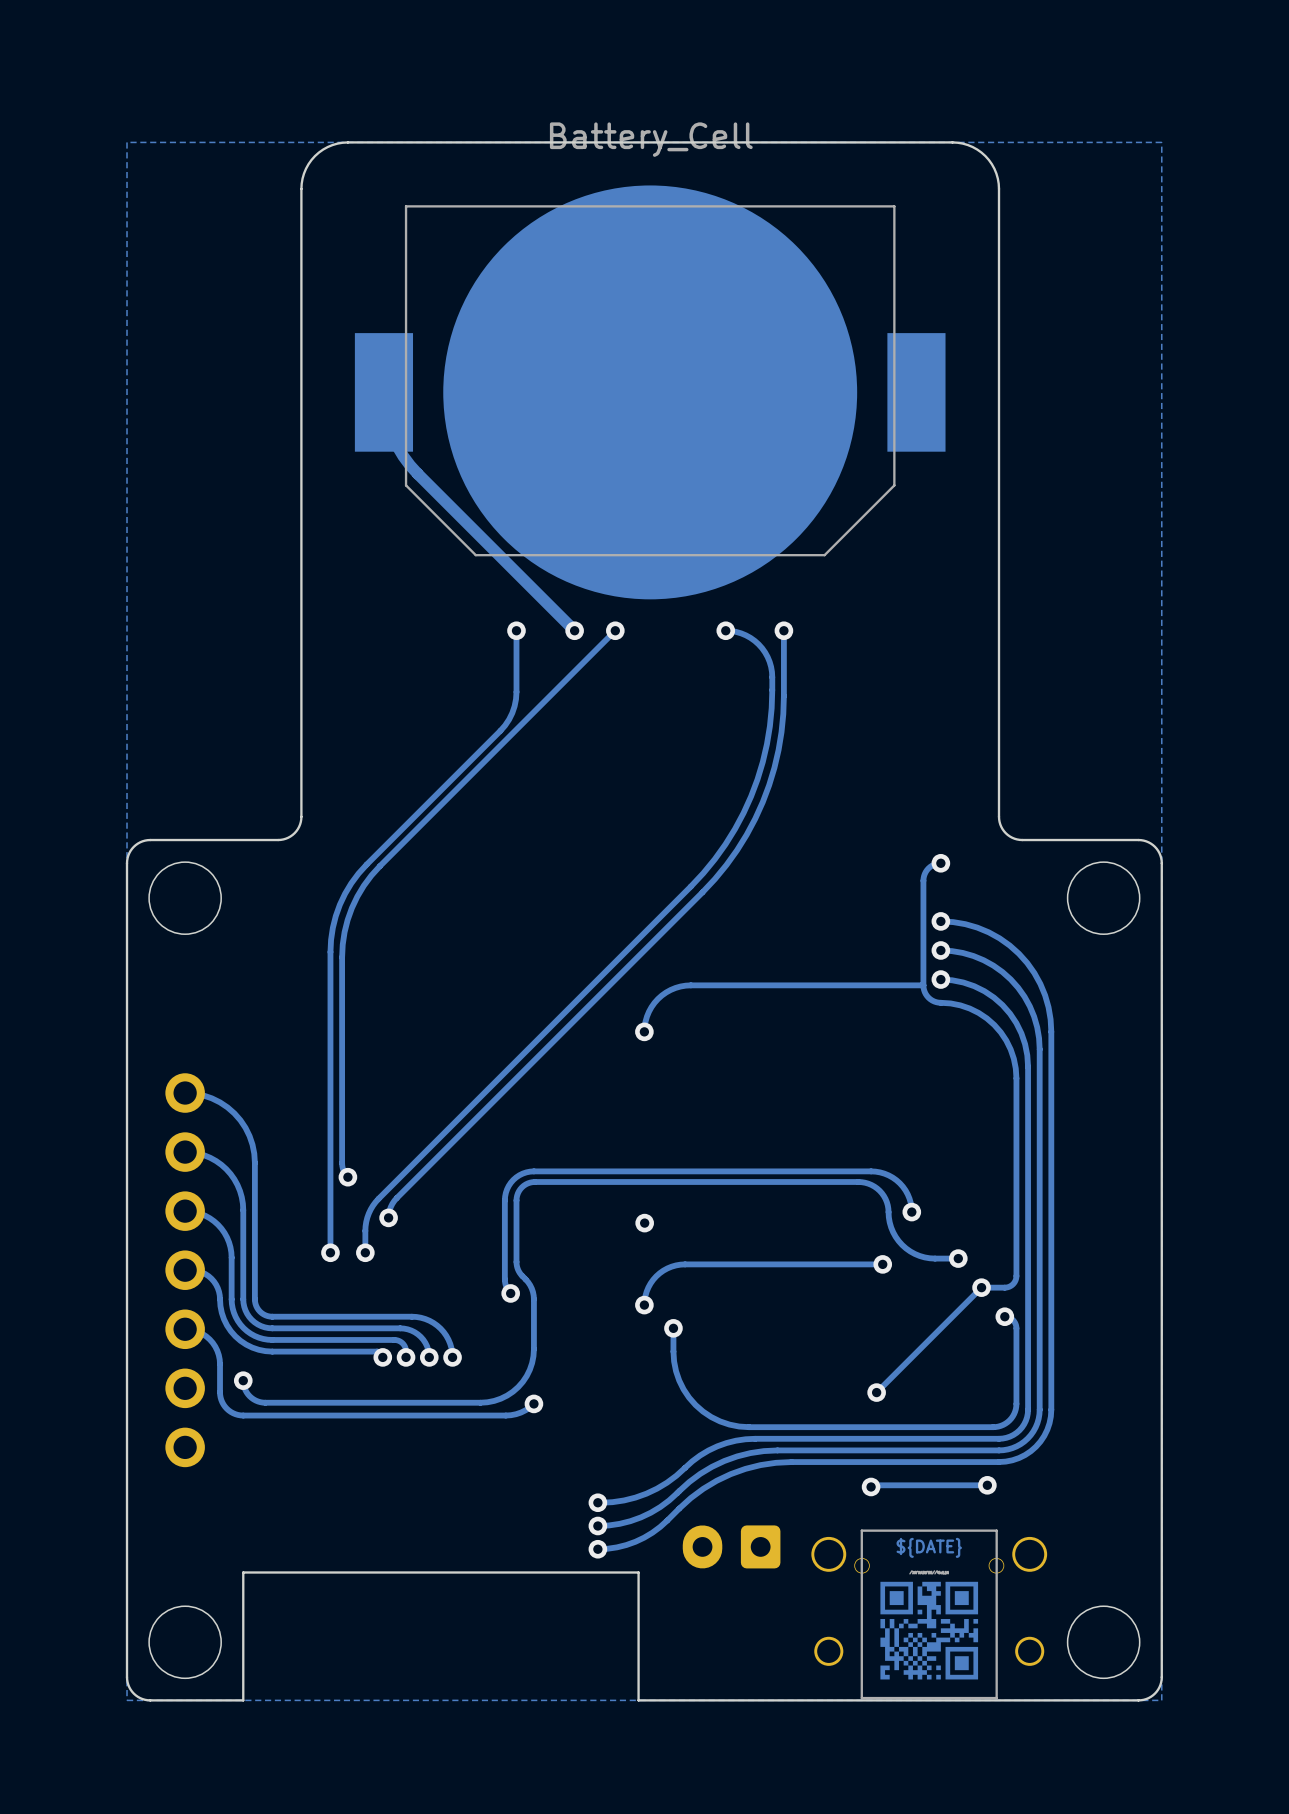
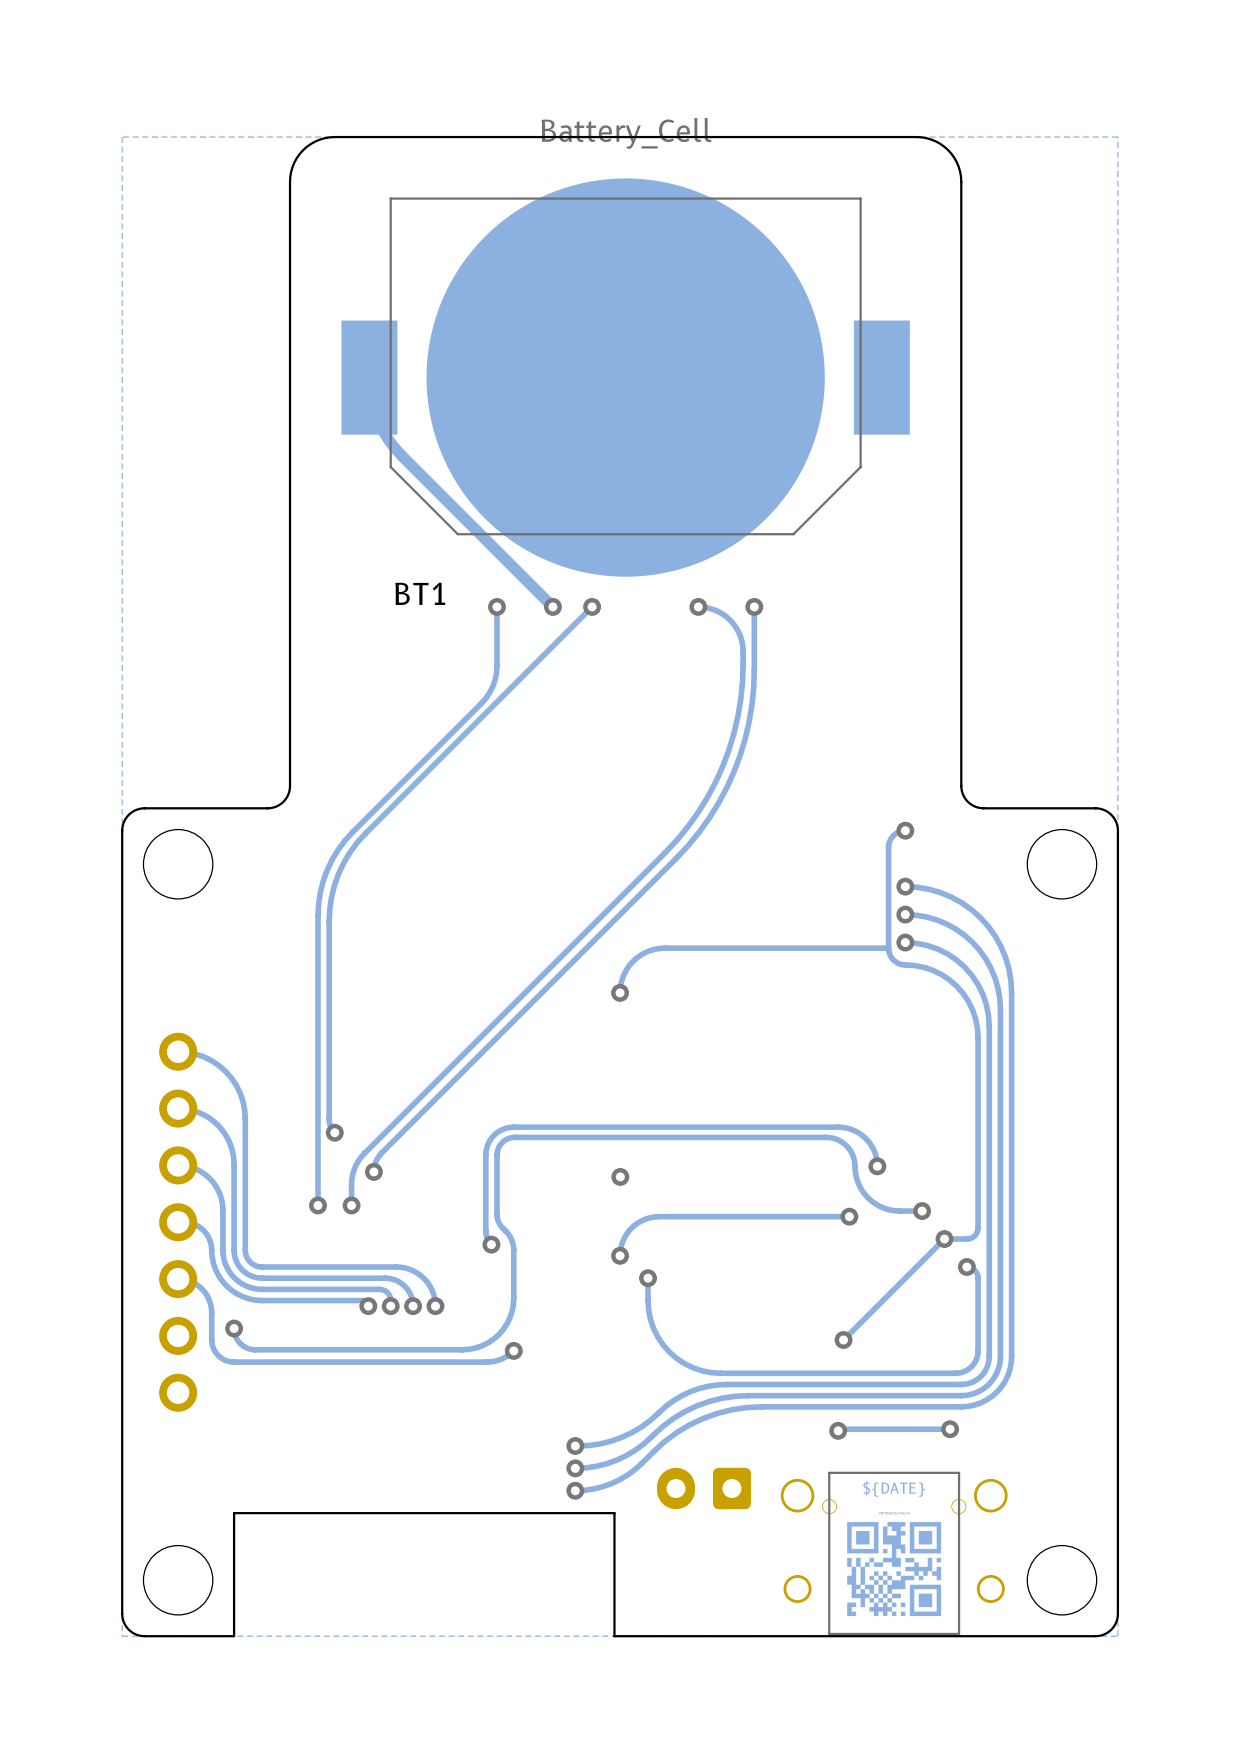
BT1 name: none -> BT1 (420, 593)

